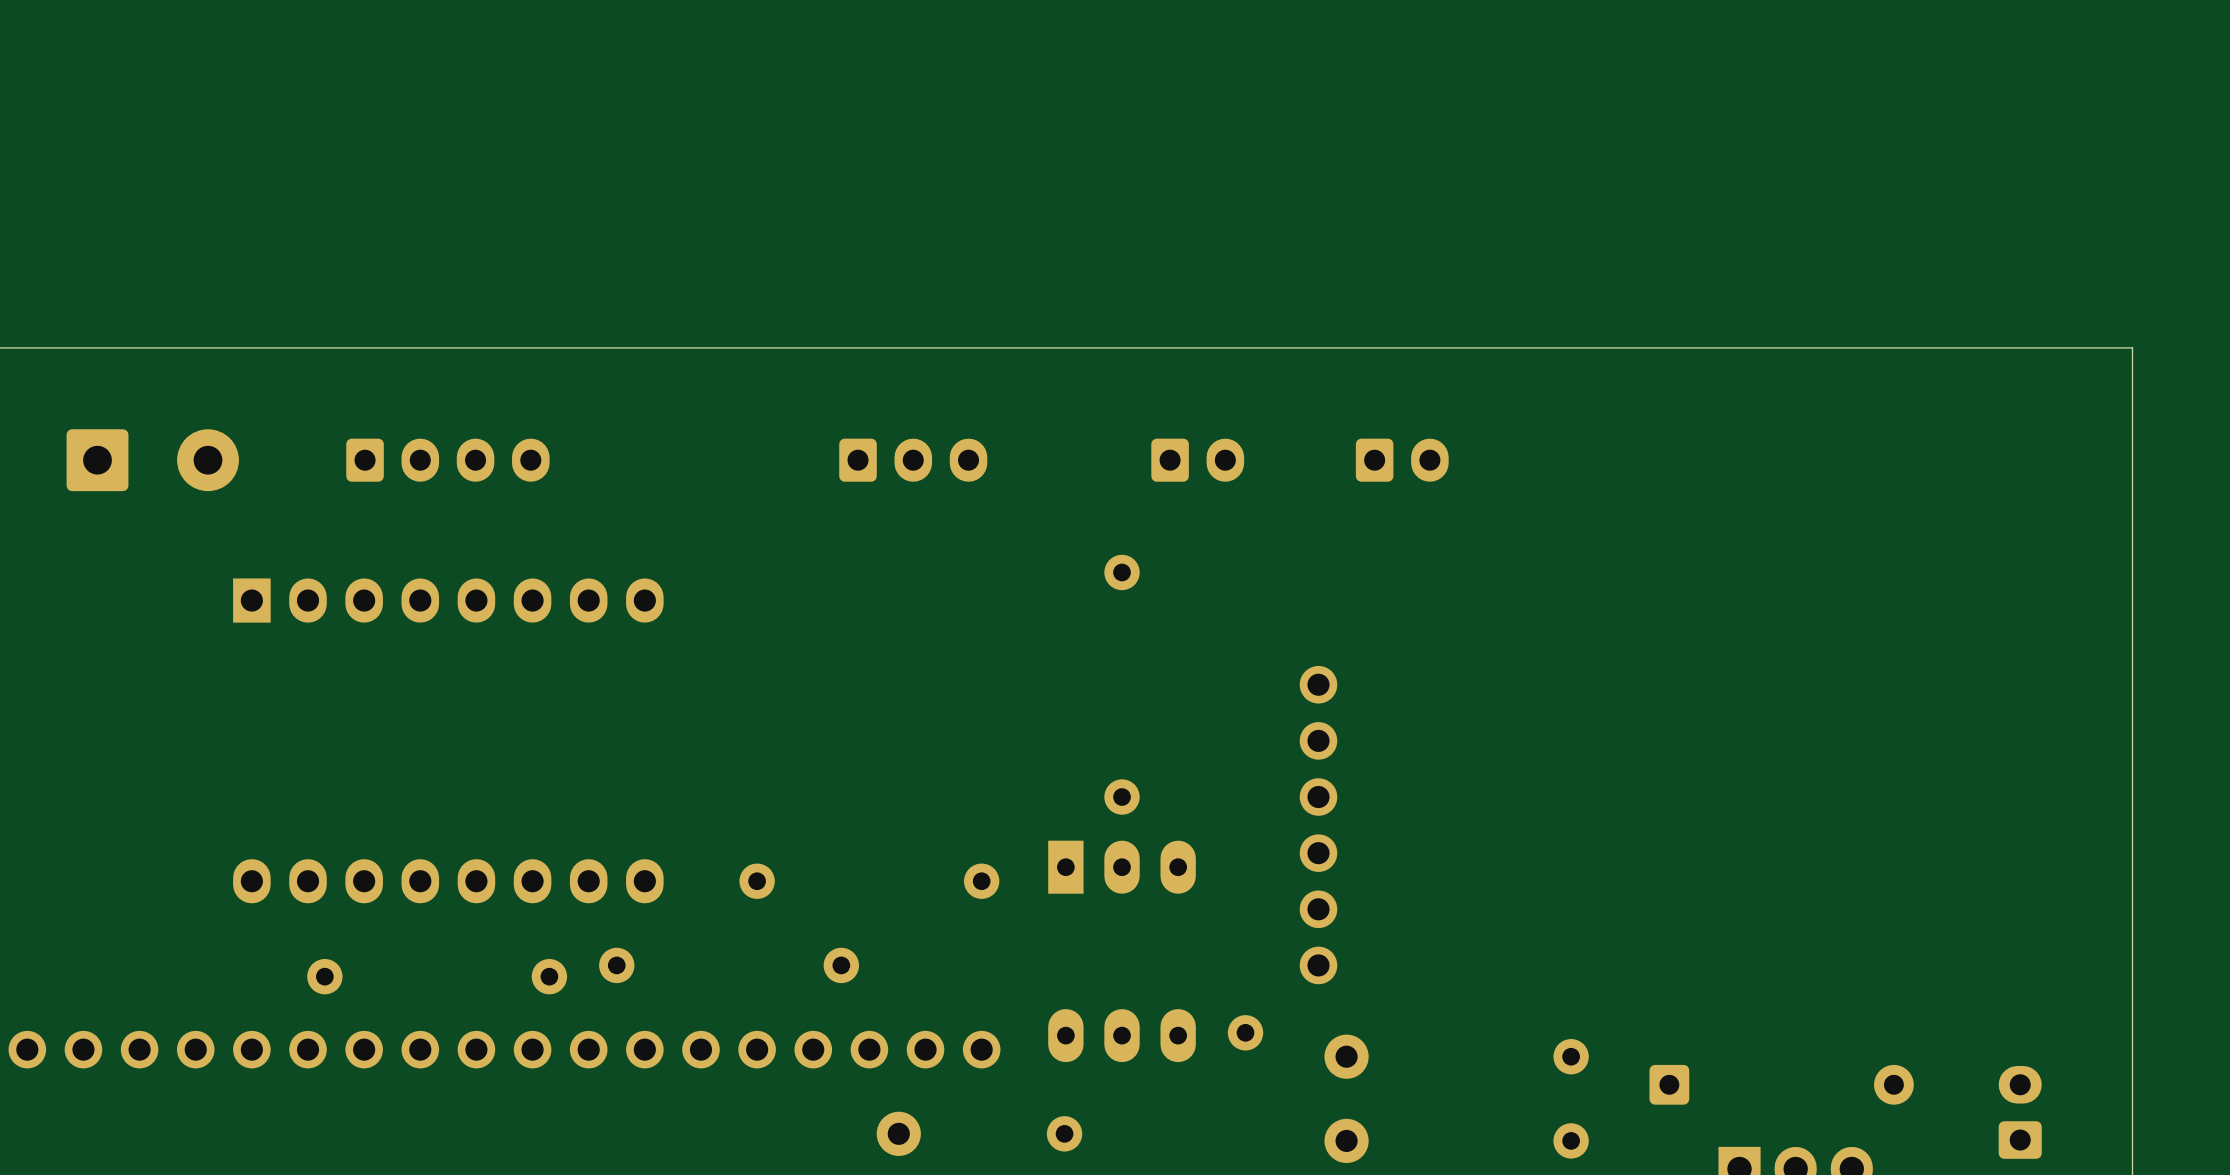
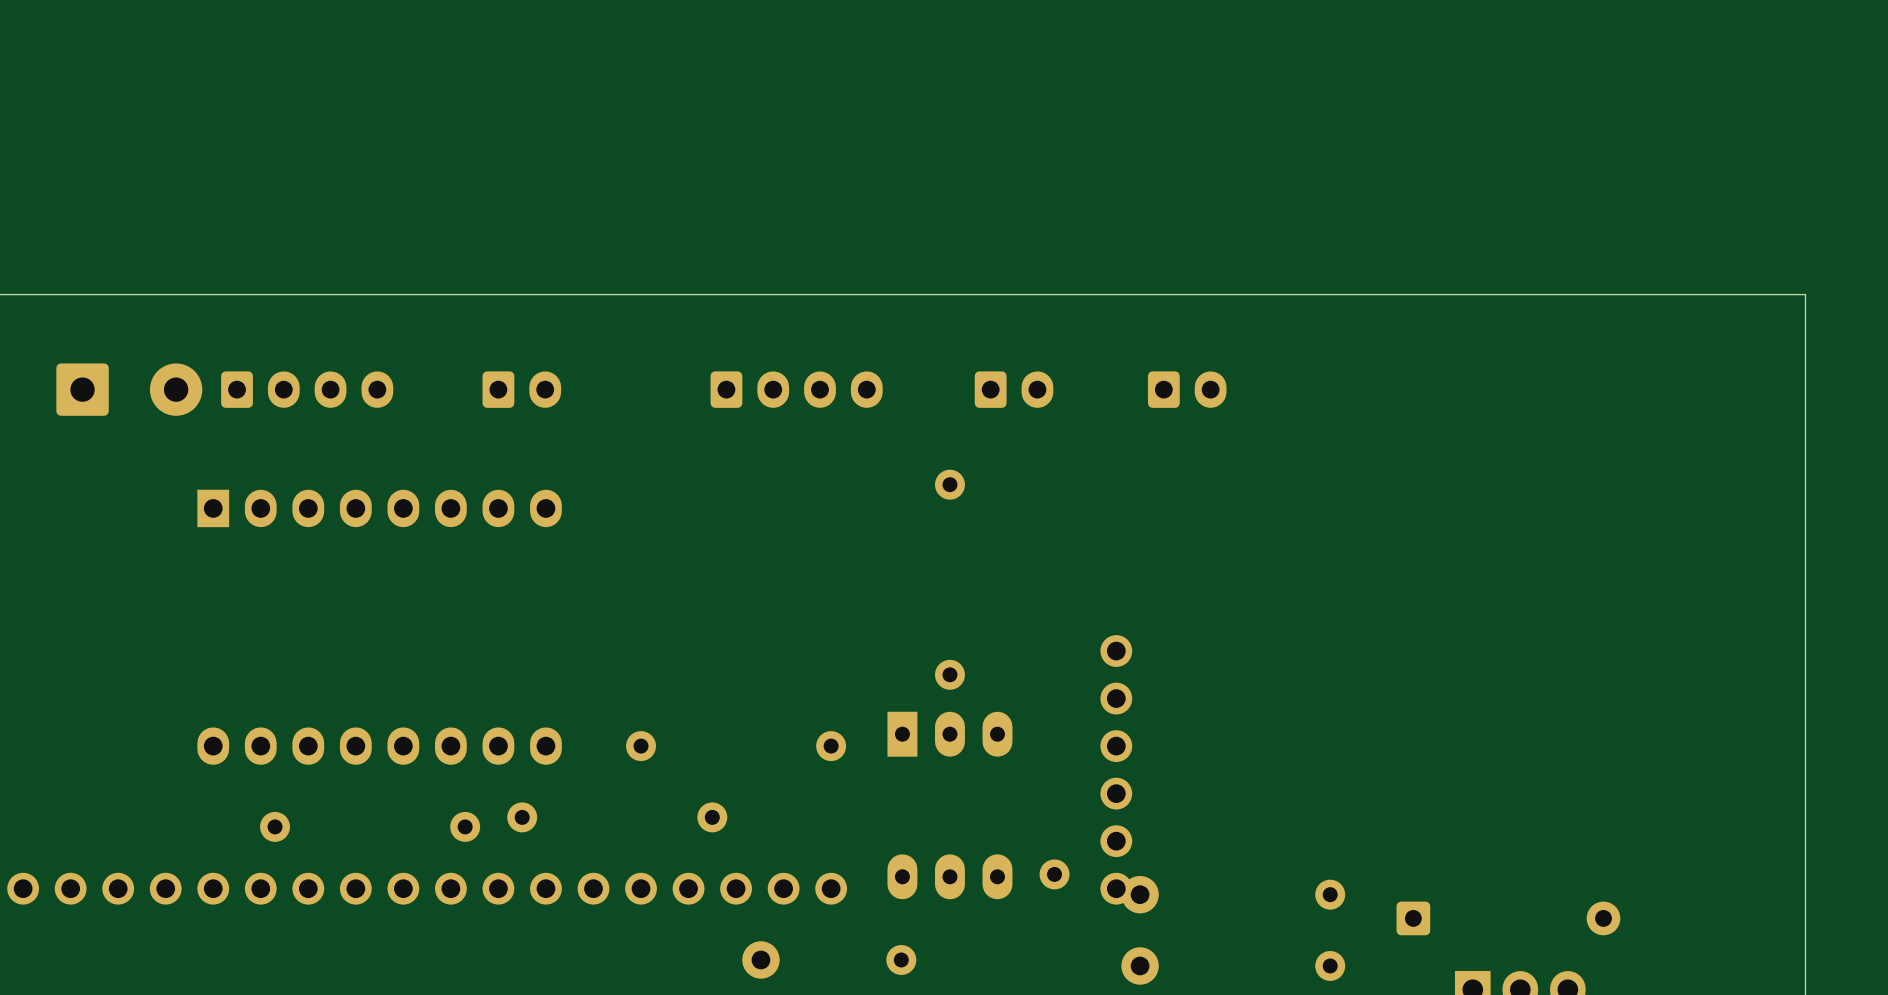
part position: (447, 460) -> (307, 389)
part: none -> (521, 389)
part: none -> (796, 389)
part position: (1318, 825) -> (1116, 769)
part: (2020, 1112) -> none

